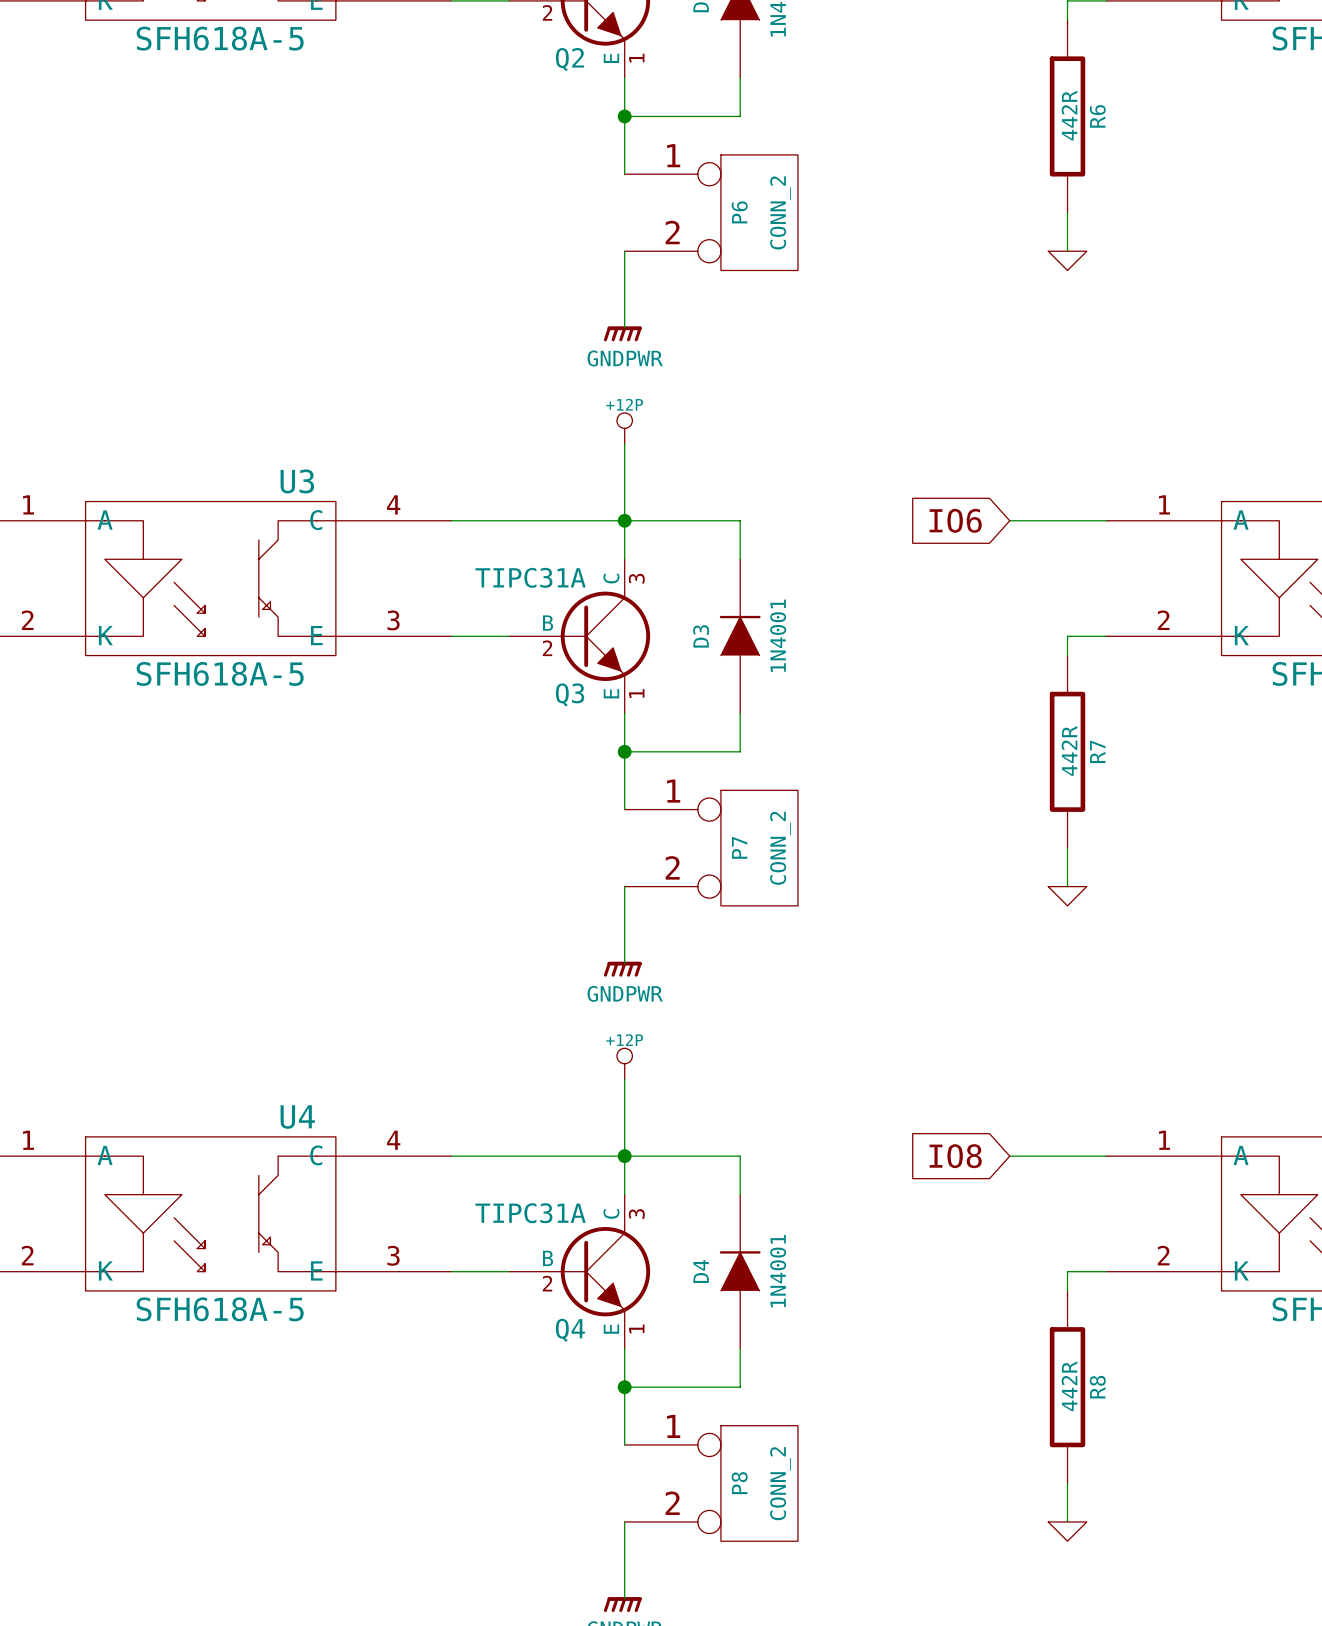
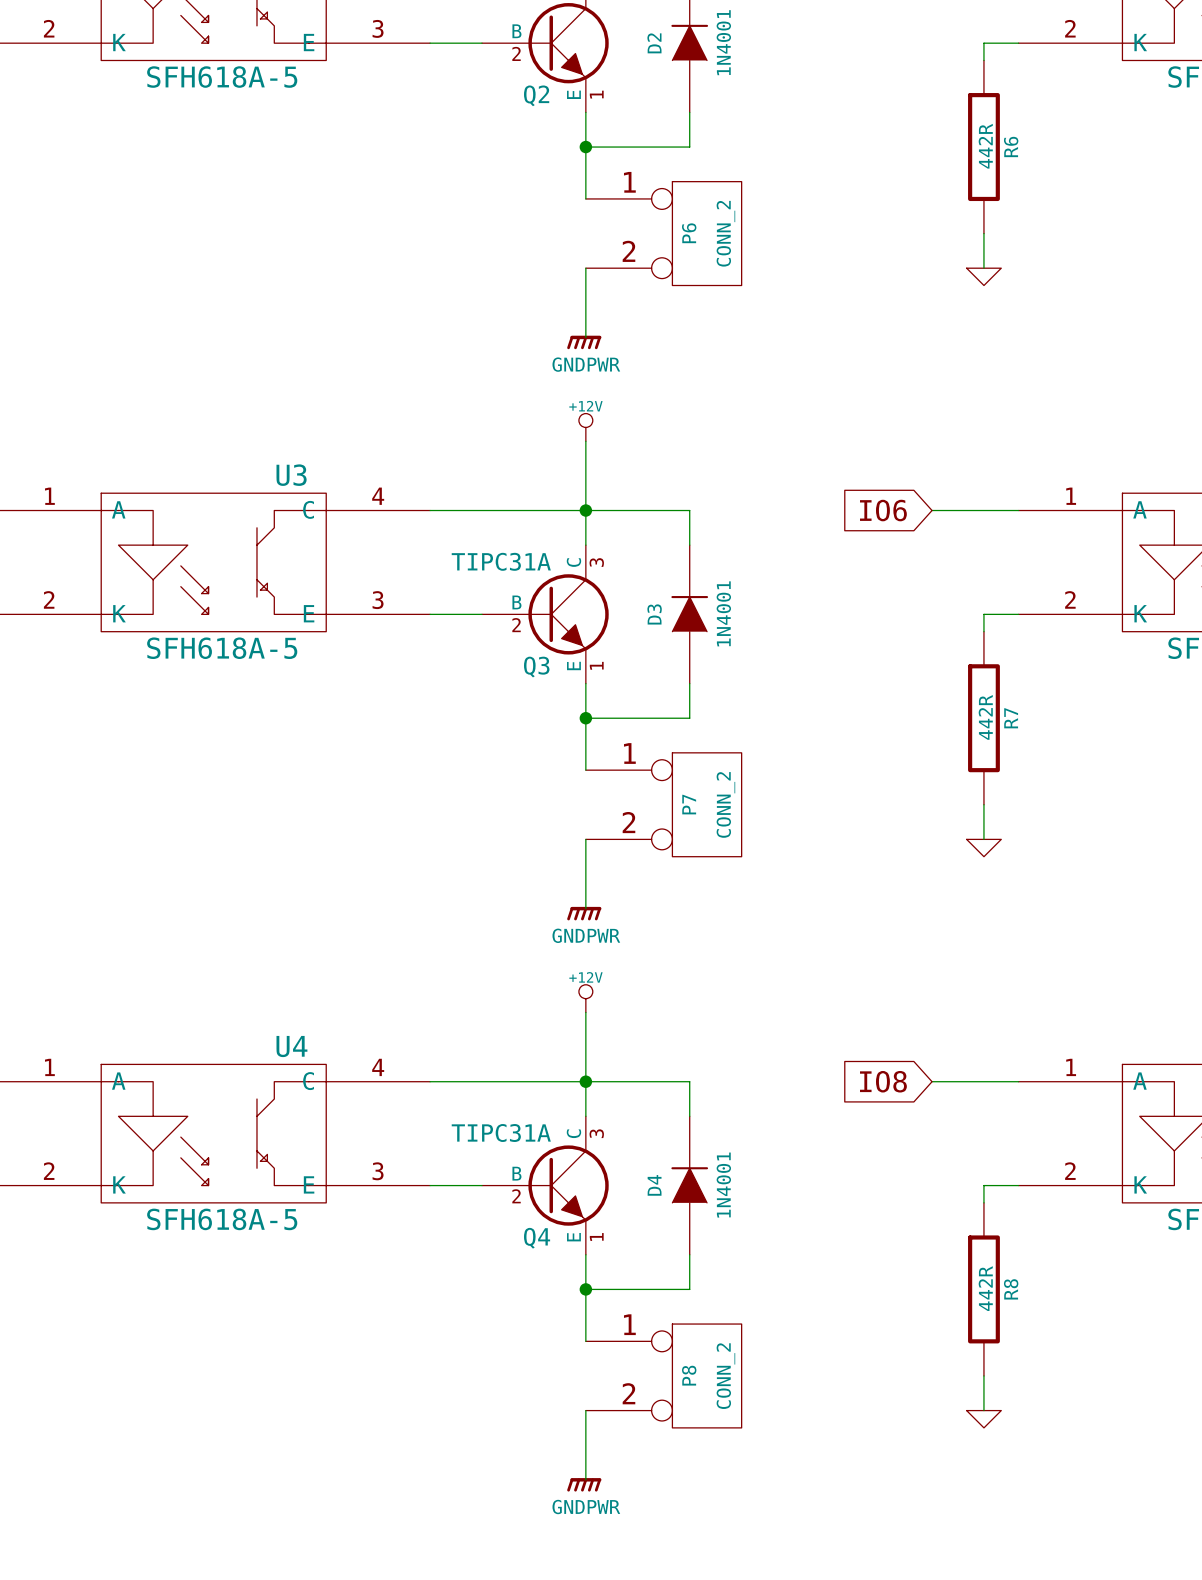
power symbol: +12P (624, 428) -> +12V (585, 427)
power symbol: +12P (624, 1063) -> +12V (585, 998)

